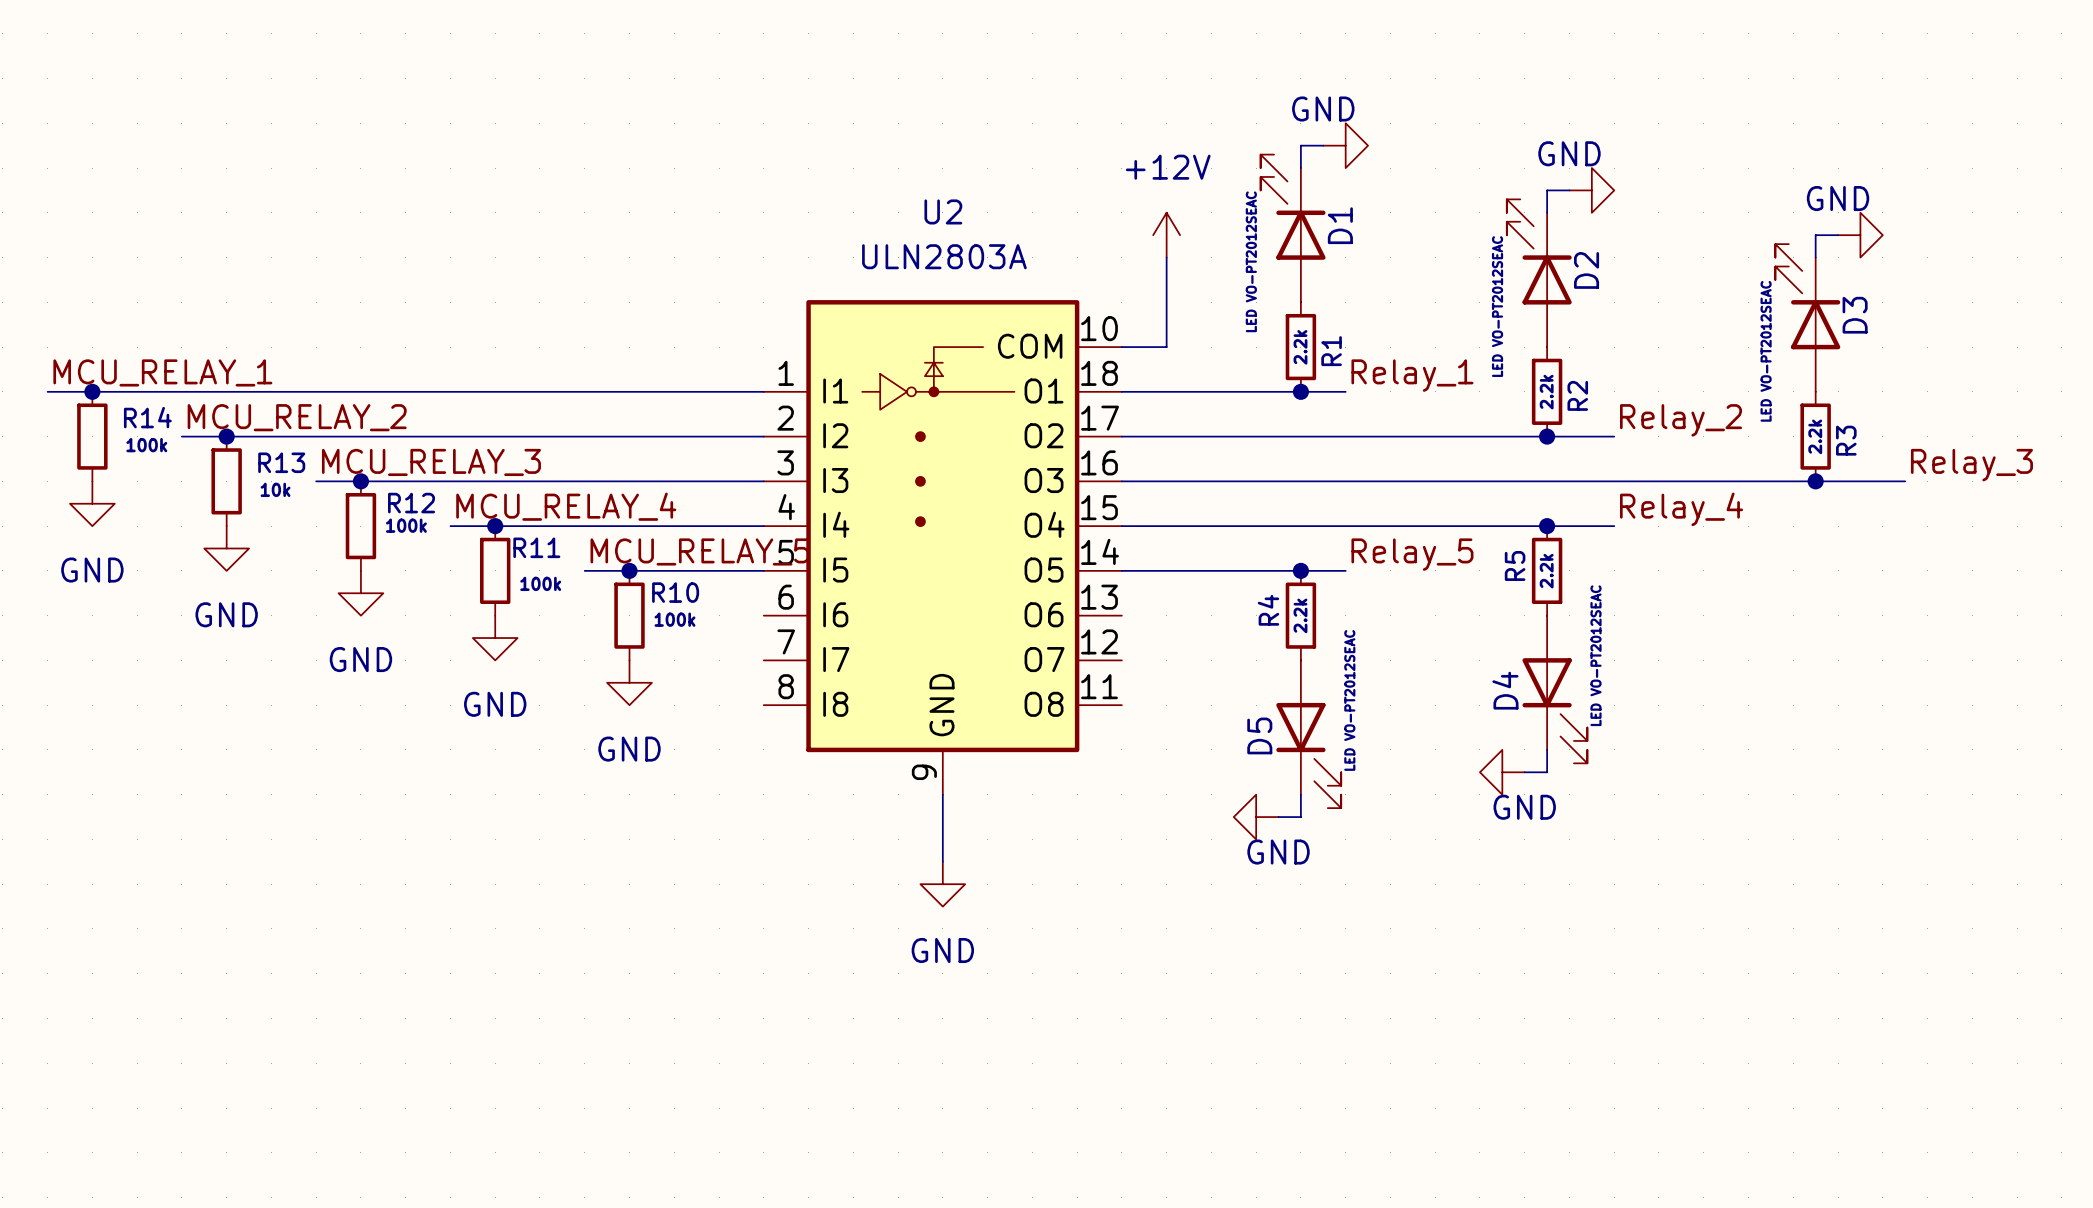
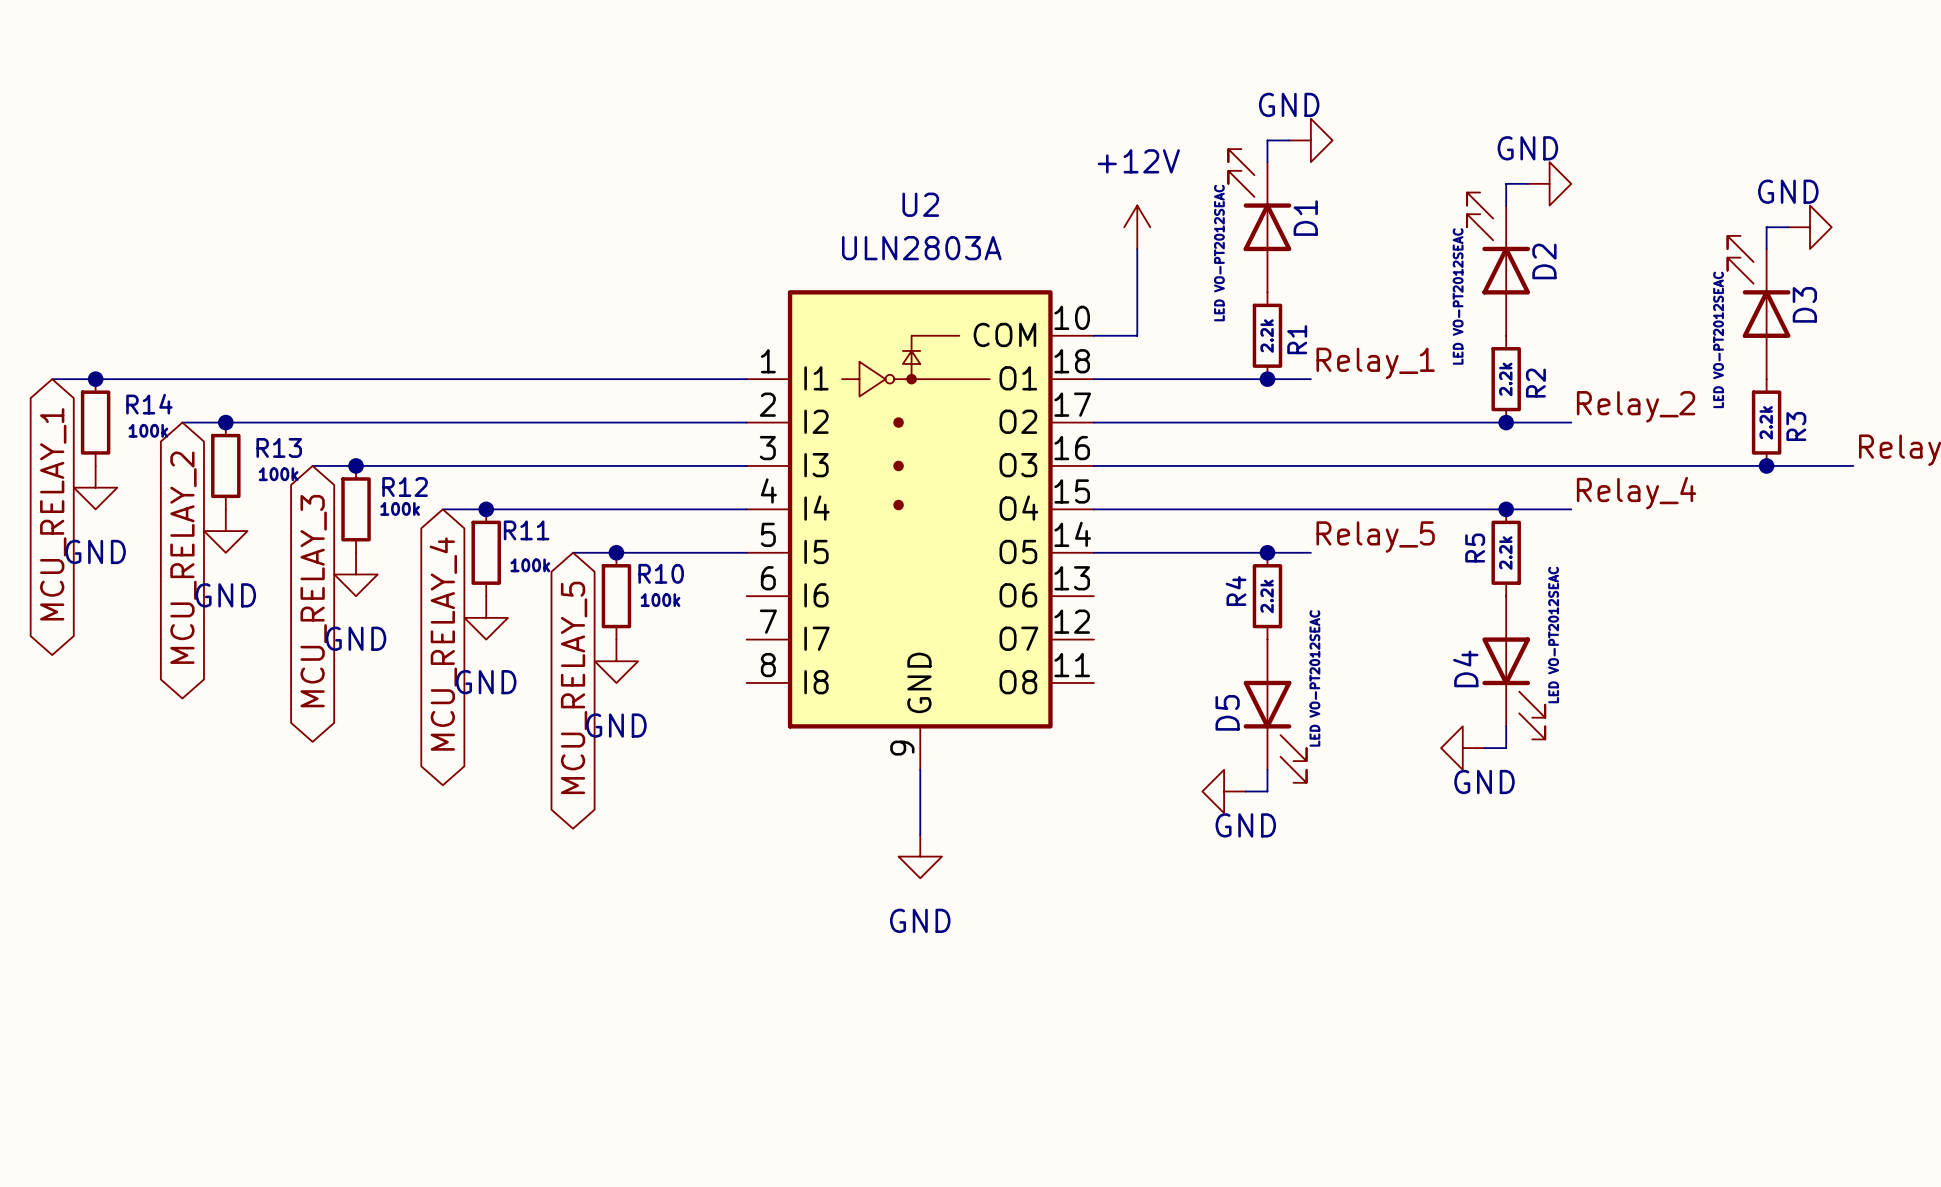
label: MCU_RELAY_1 (162, 372) -> none
label: MCU_RELAY_2 (297, 417) -> none
label: MCU_RELAY_3 (431, 462) -> none
R13 value: 10k (275, 489) -> 100k (278, 474)
label: MCU_RELAY_4 (566, 506) -> none
global label: none -> MCU_RELAY_1 (53, 514)
label: MCU_RELAY_5 (700, 551) -> none
global label: none -> MCU_RELAY_2 (183, 557)
global label: none -> MCU_RELAY_3 (313, 601)
global label: none -> MCU_RELAY_4 (443, 644)
global label: none -> MCU_RELAY_5 (574, 687)

